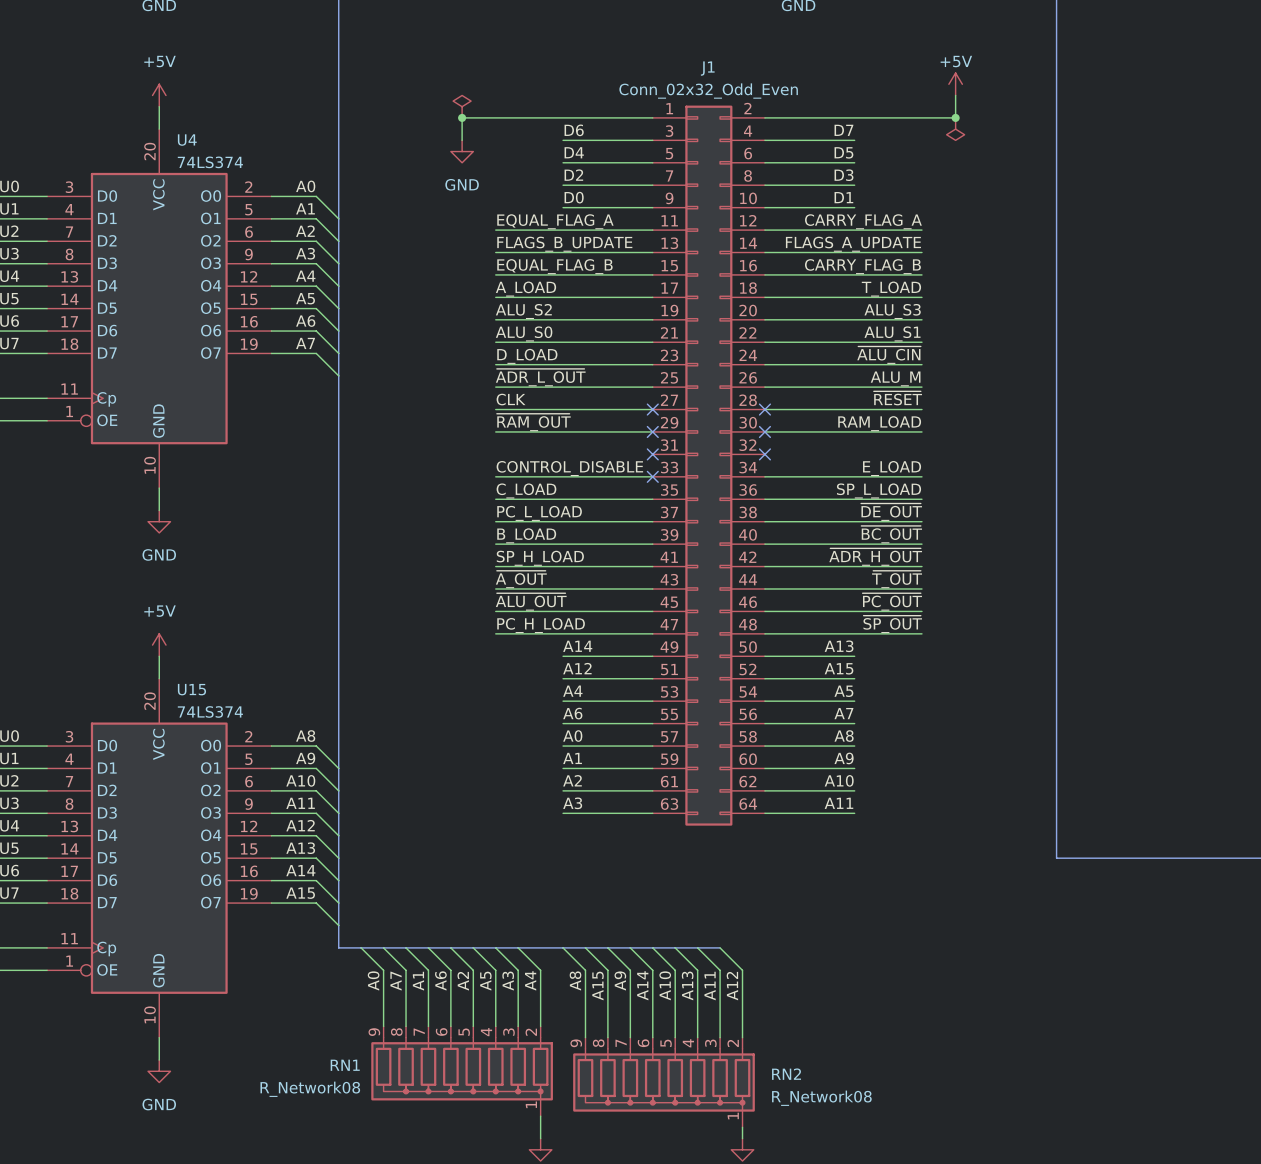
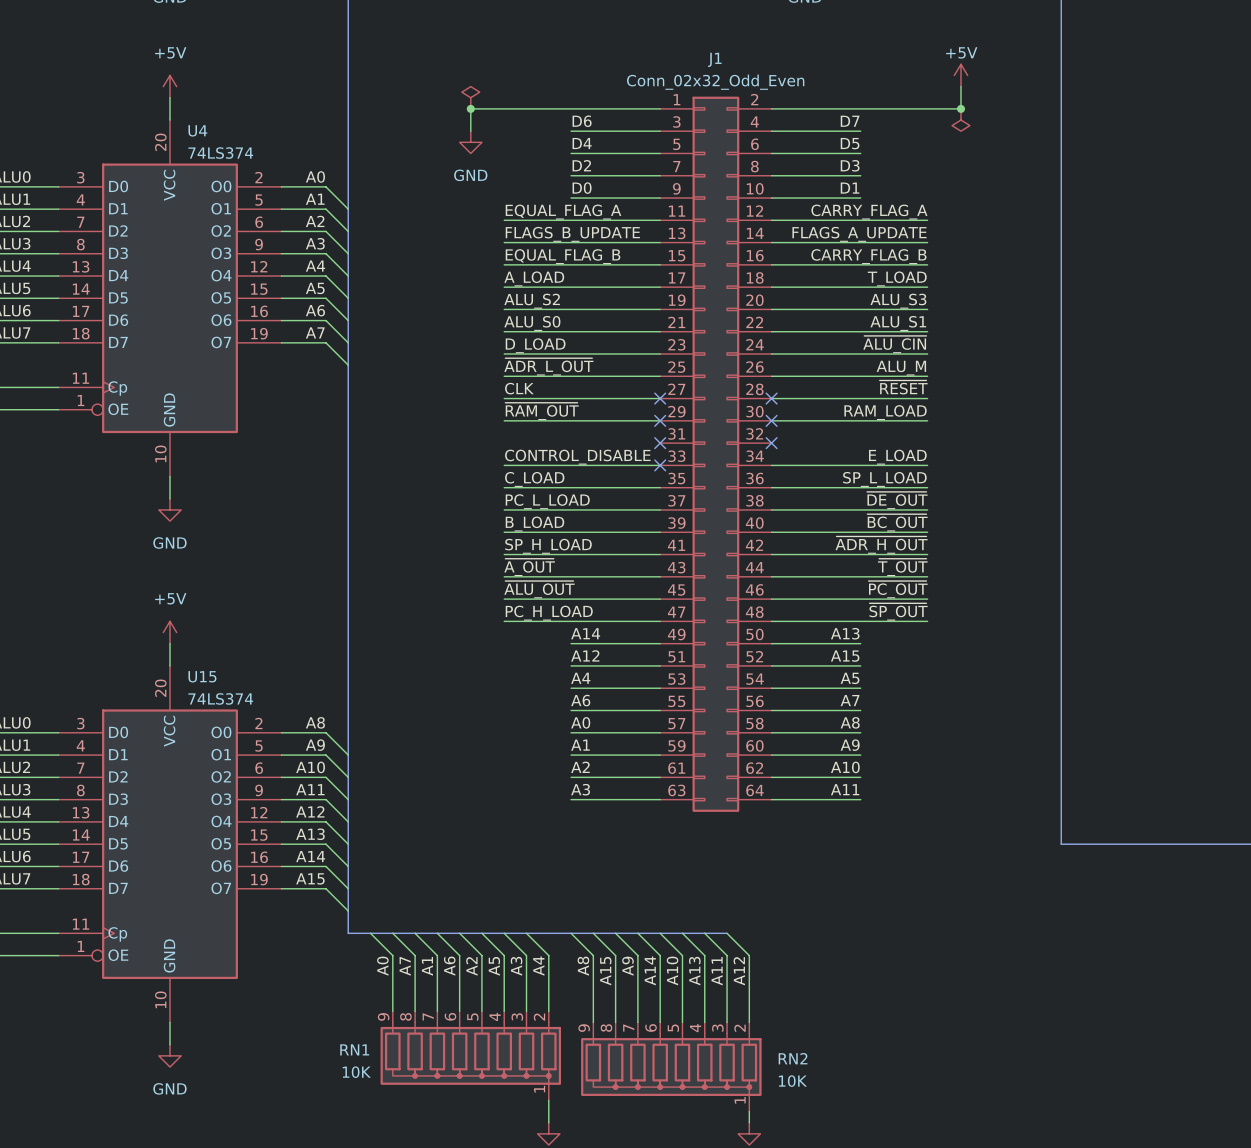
RN1 value: R_Network08 (310, 1089) -> 10K (356, 1072)
RN2 value: R_Network08 (821, 1098) -> 10K (792, 1081)

